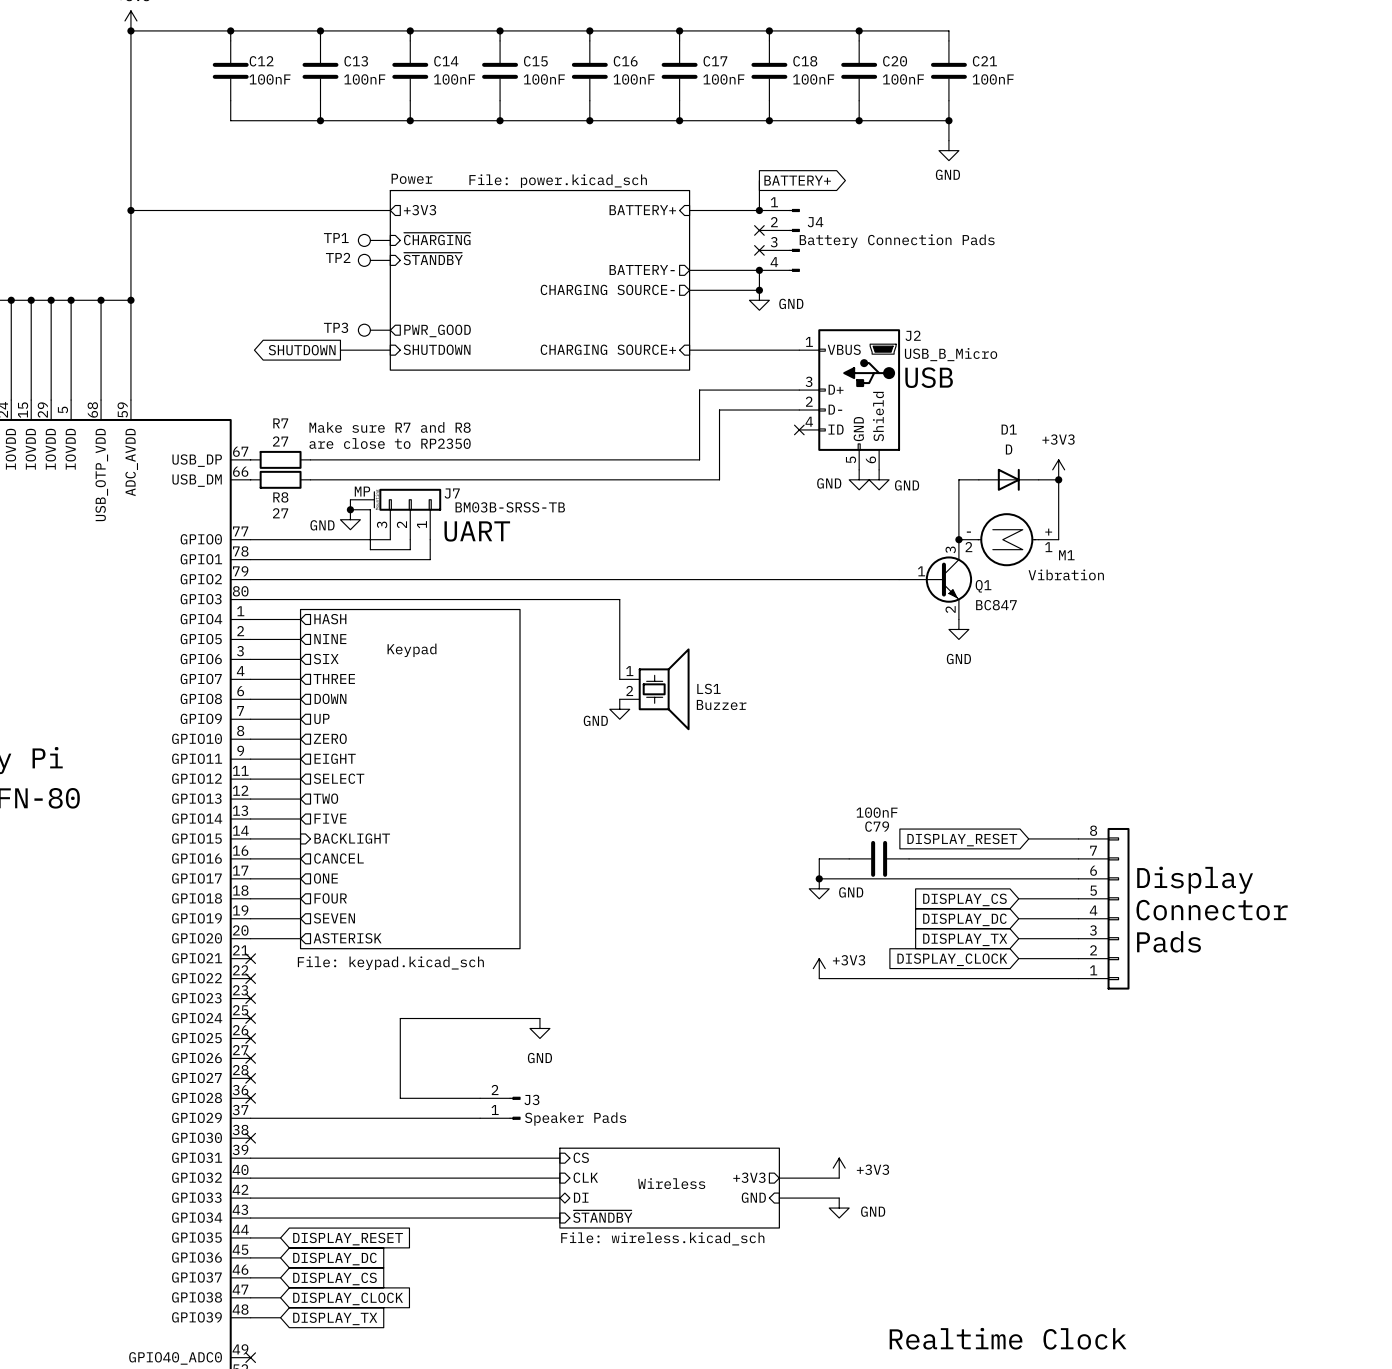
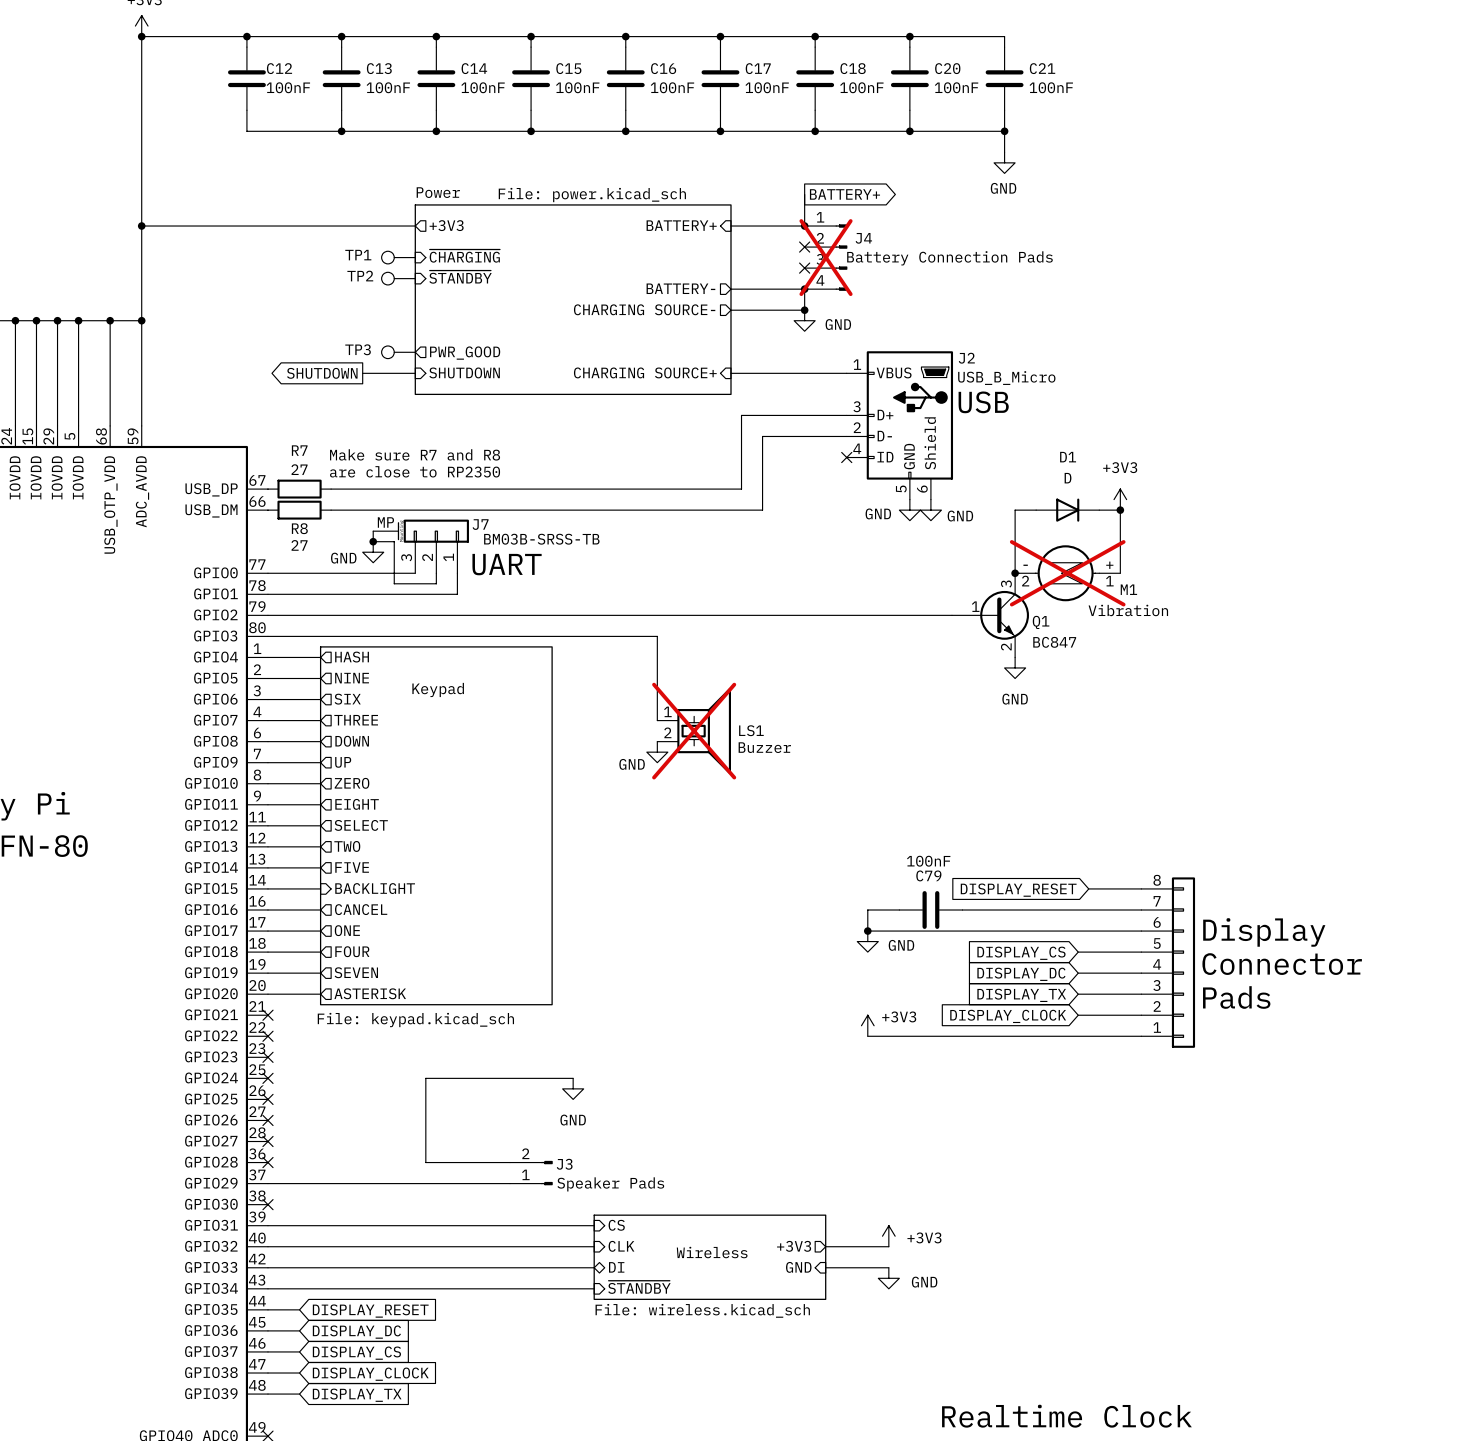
J4 do-not-place cross: none -> (826, 257)
M1 do-not-place cross: none -> (1067, 573)
LS1 do-not-place cross: none -> (694, 731)

